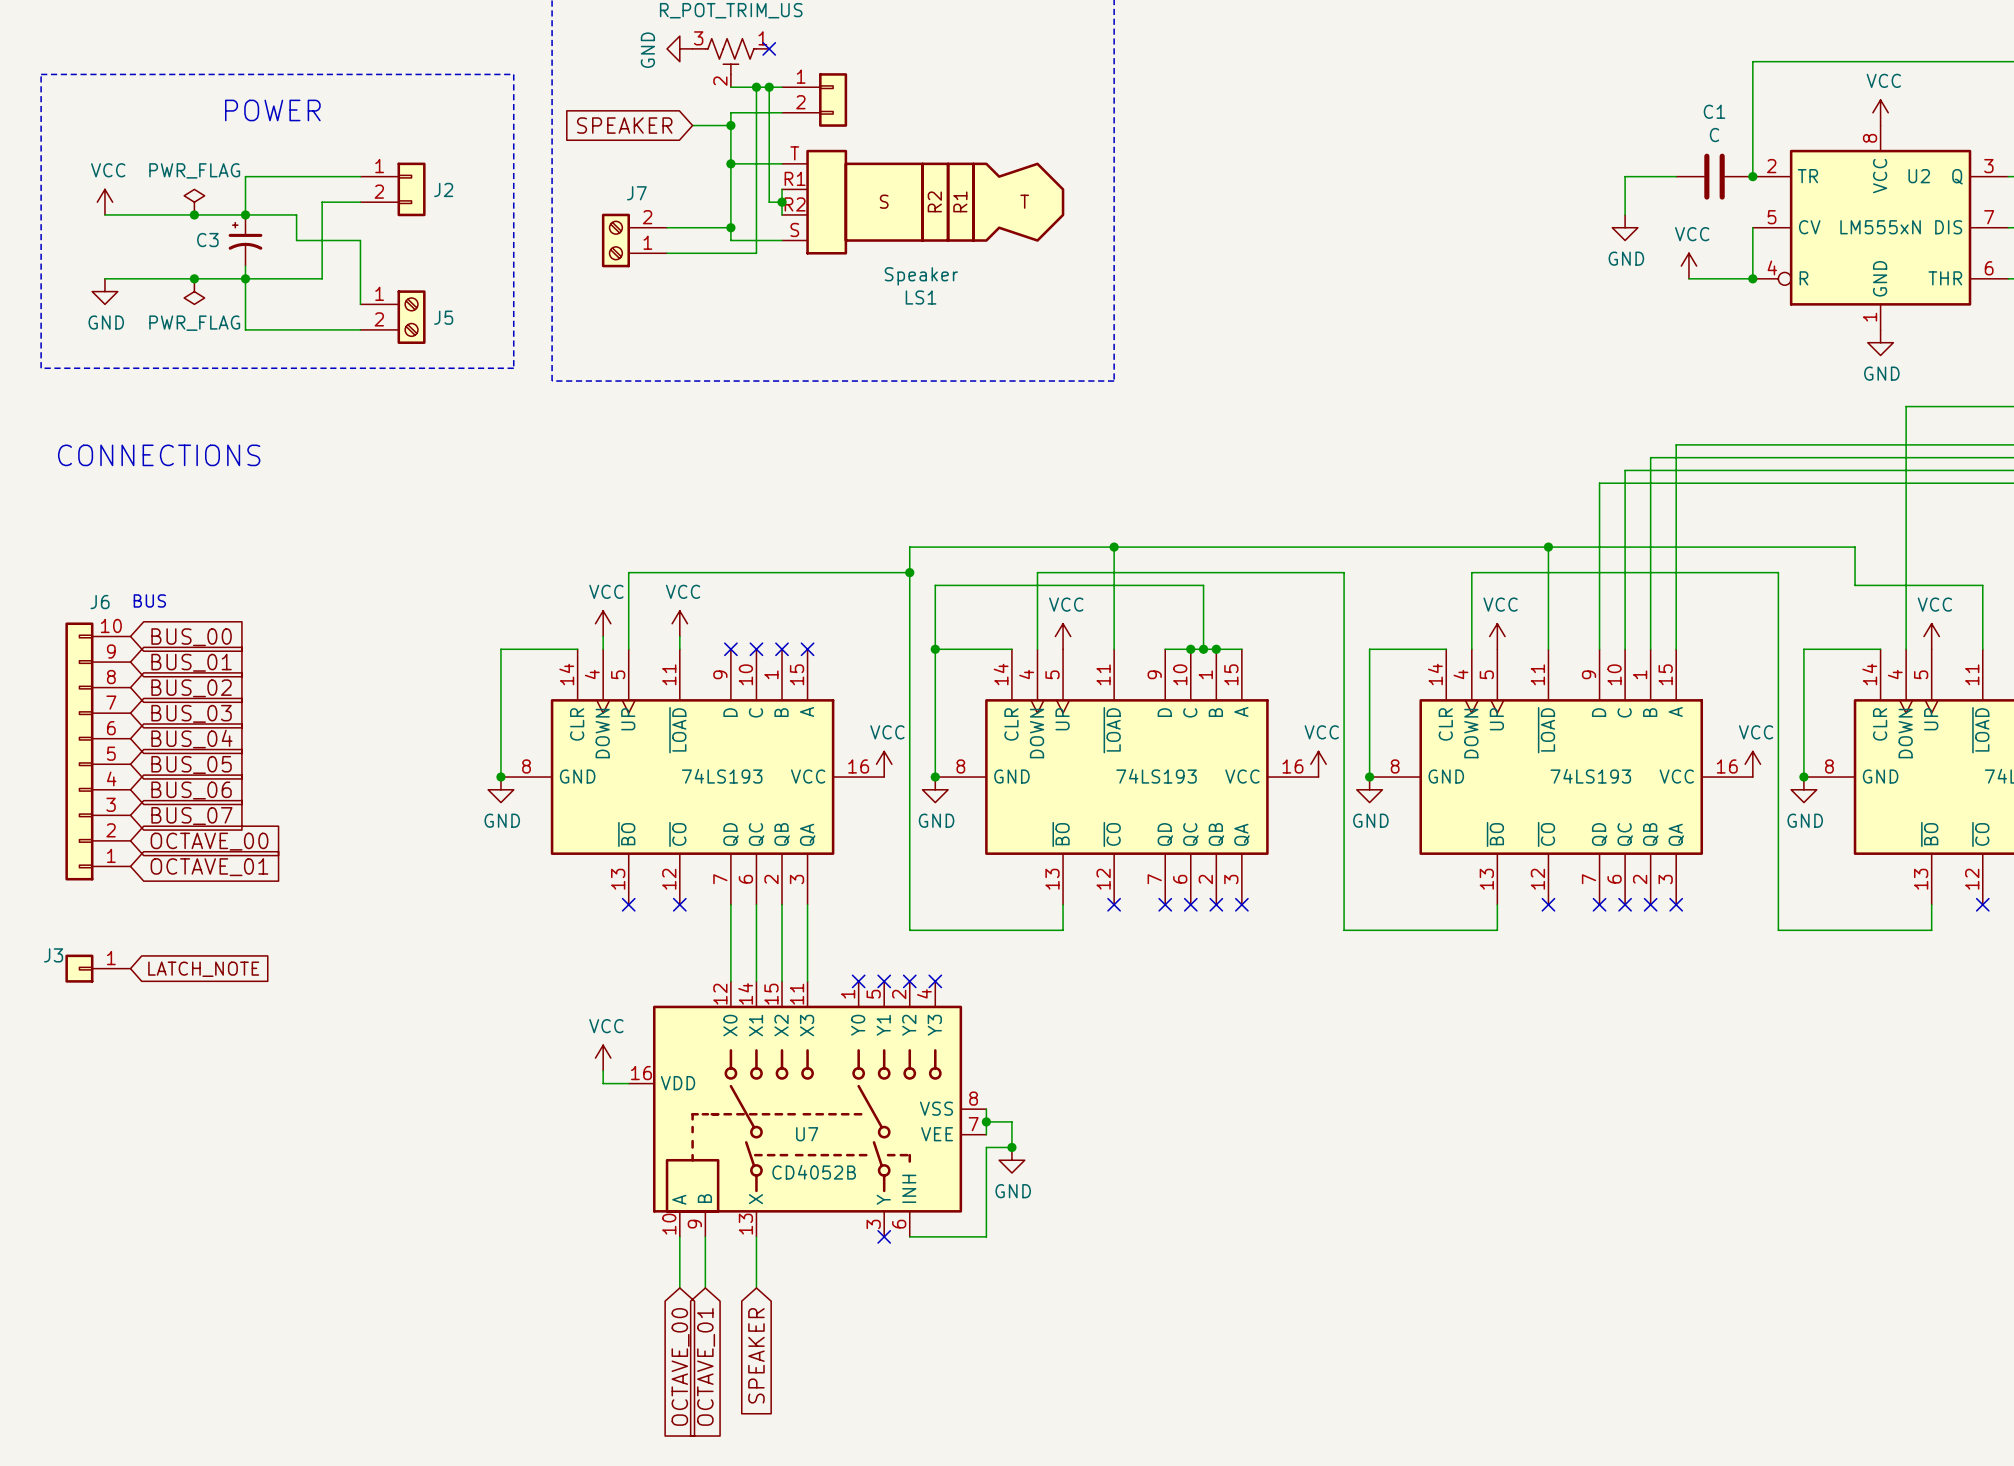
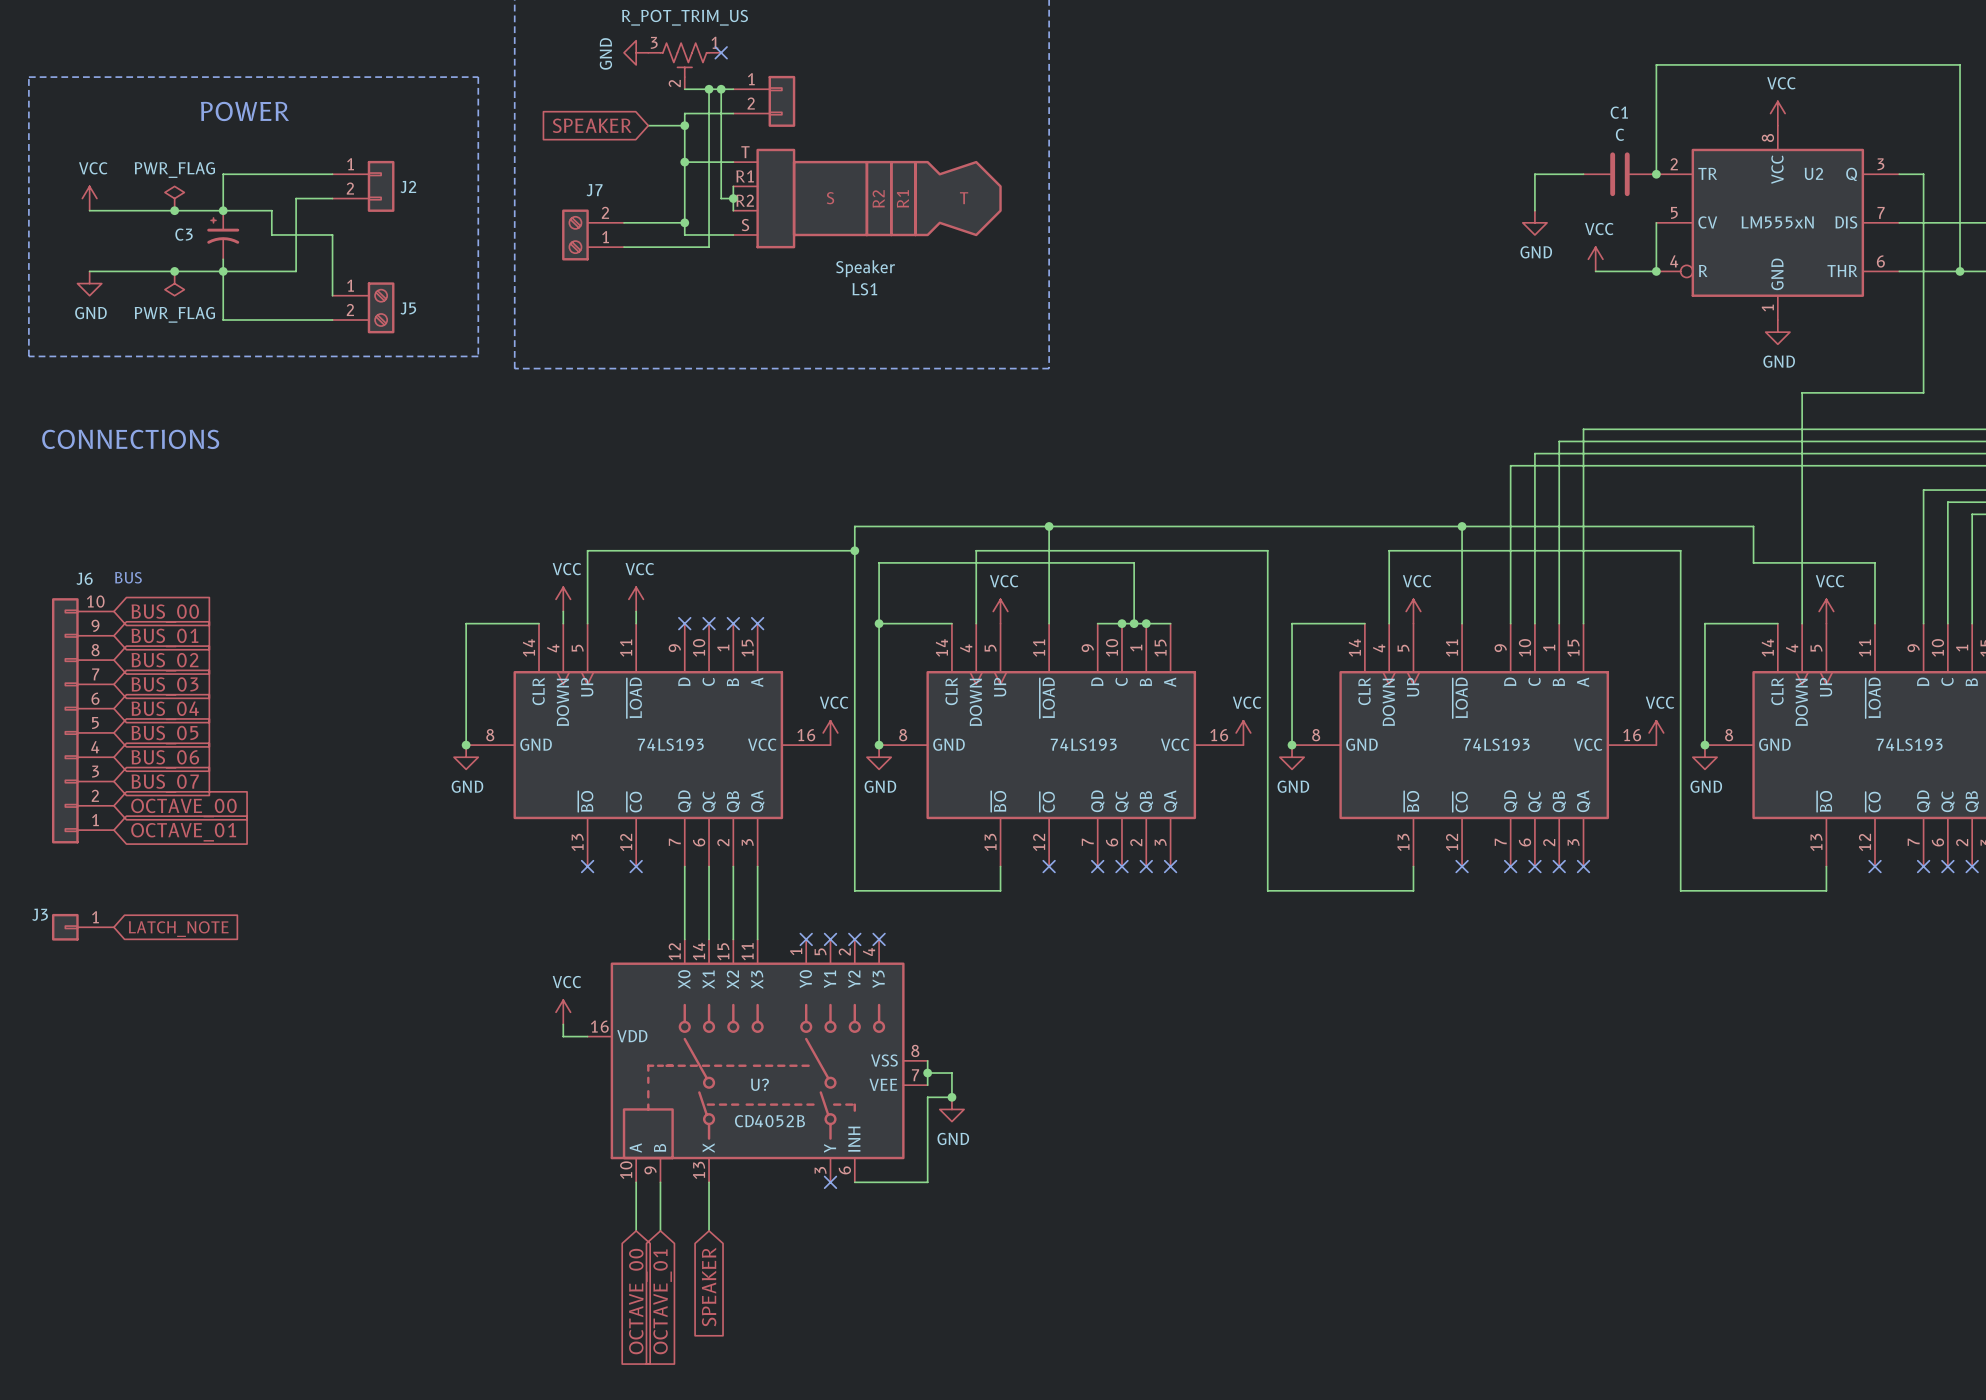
U7 name: U7 (807, 1134) -> U? (759, 1084)

